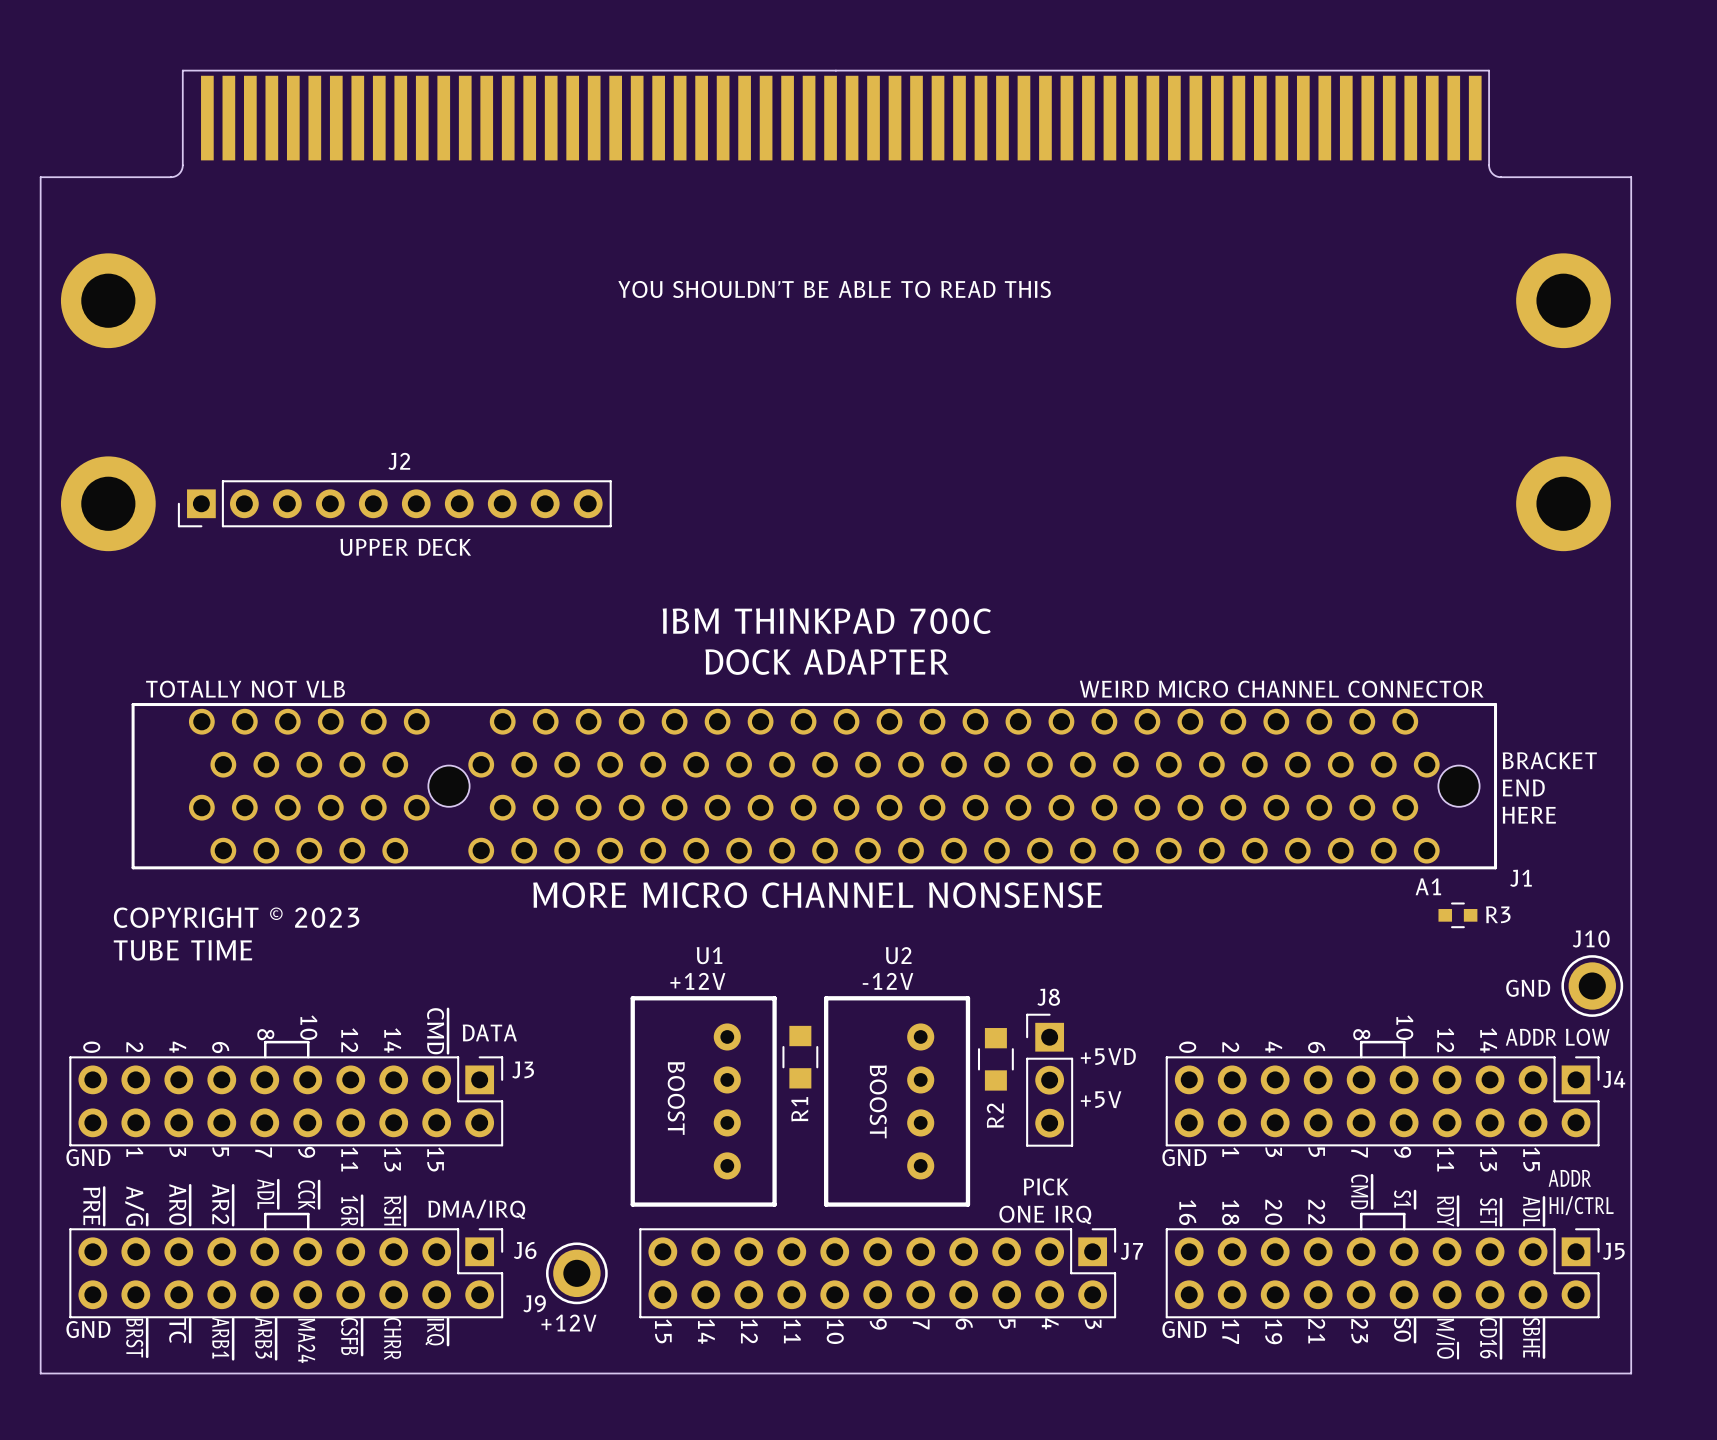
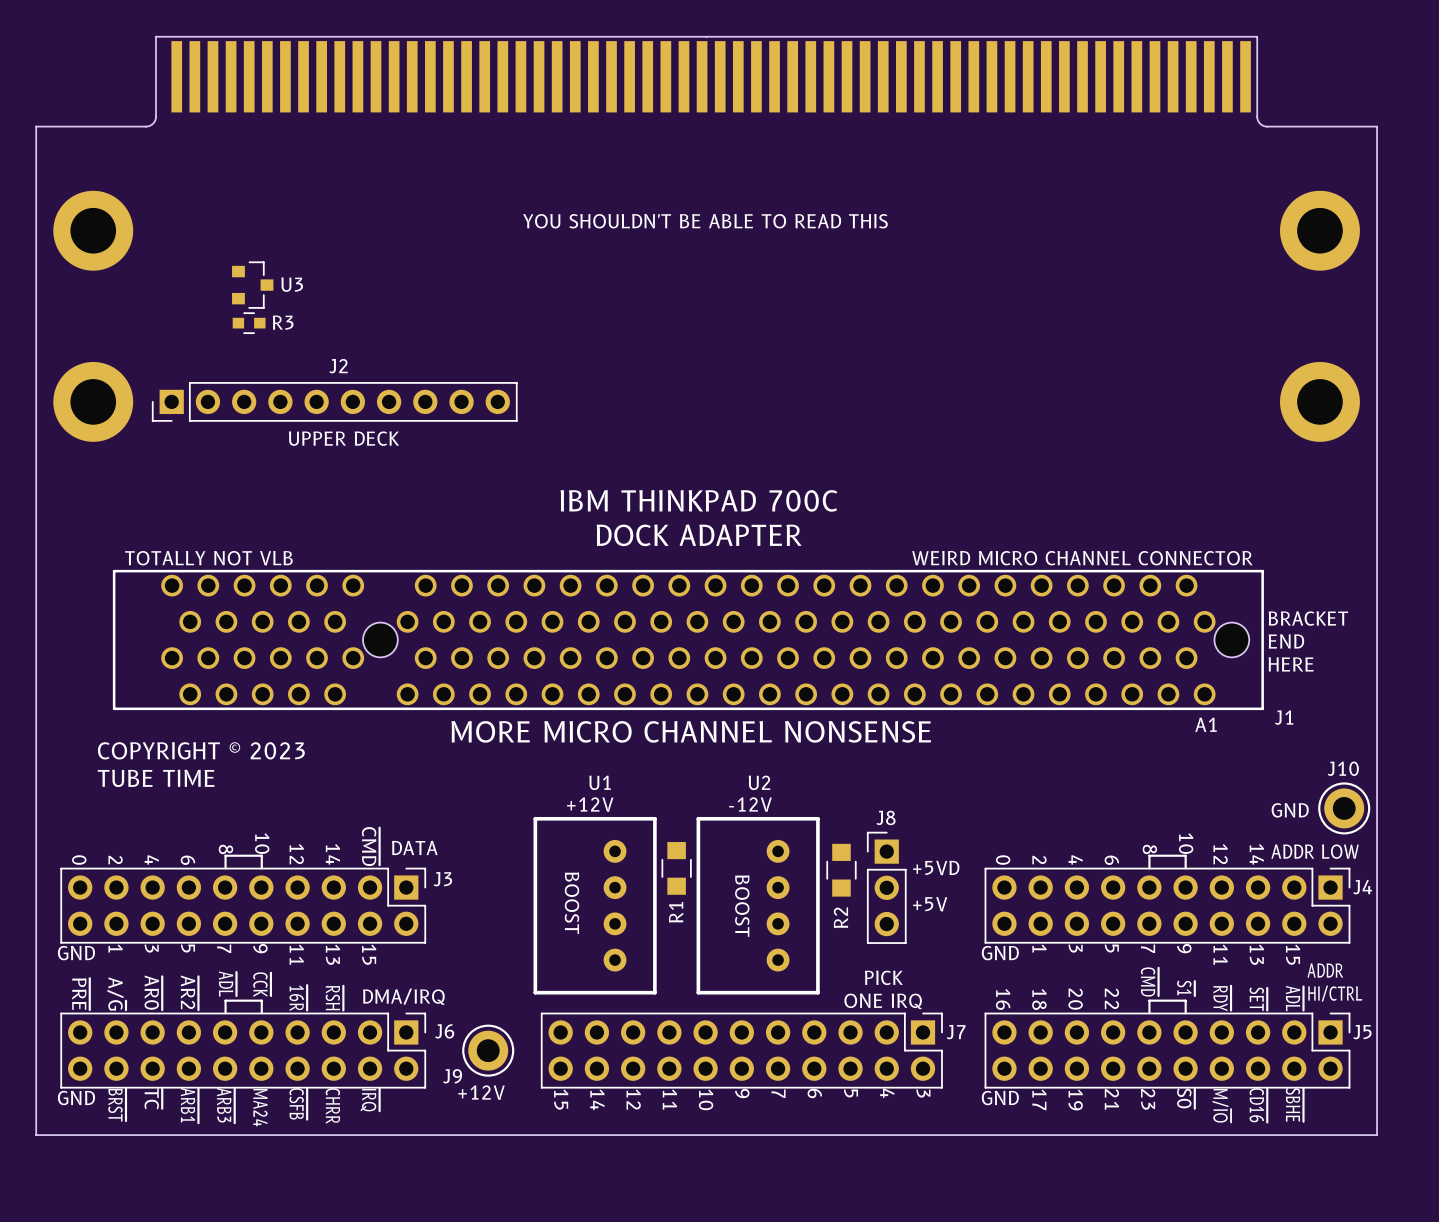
U3: none -> (252, 285)
R3 position: (1457, 915) -> (249, 323)

